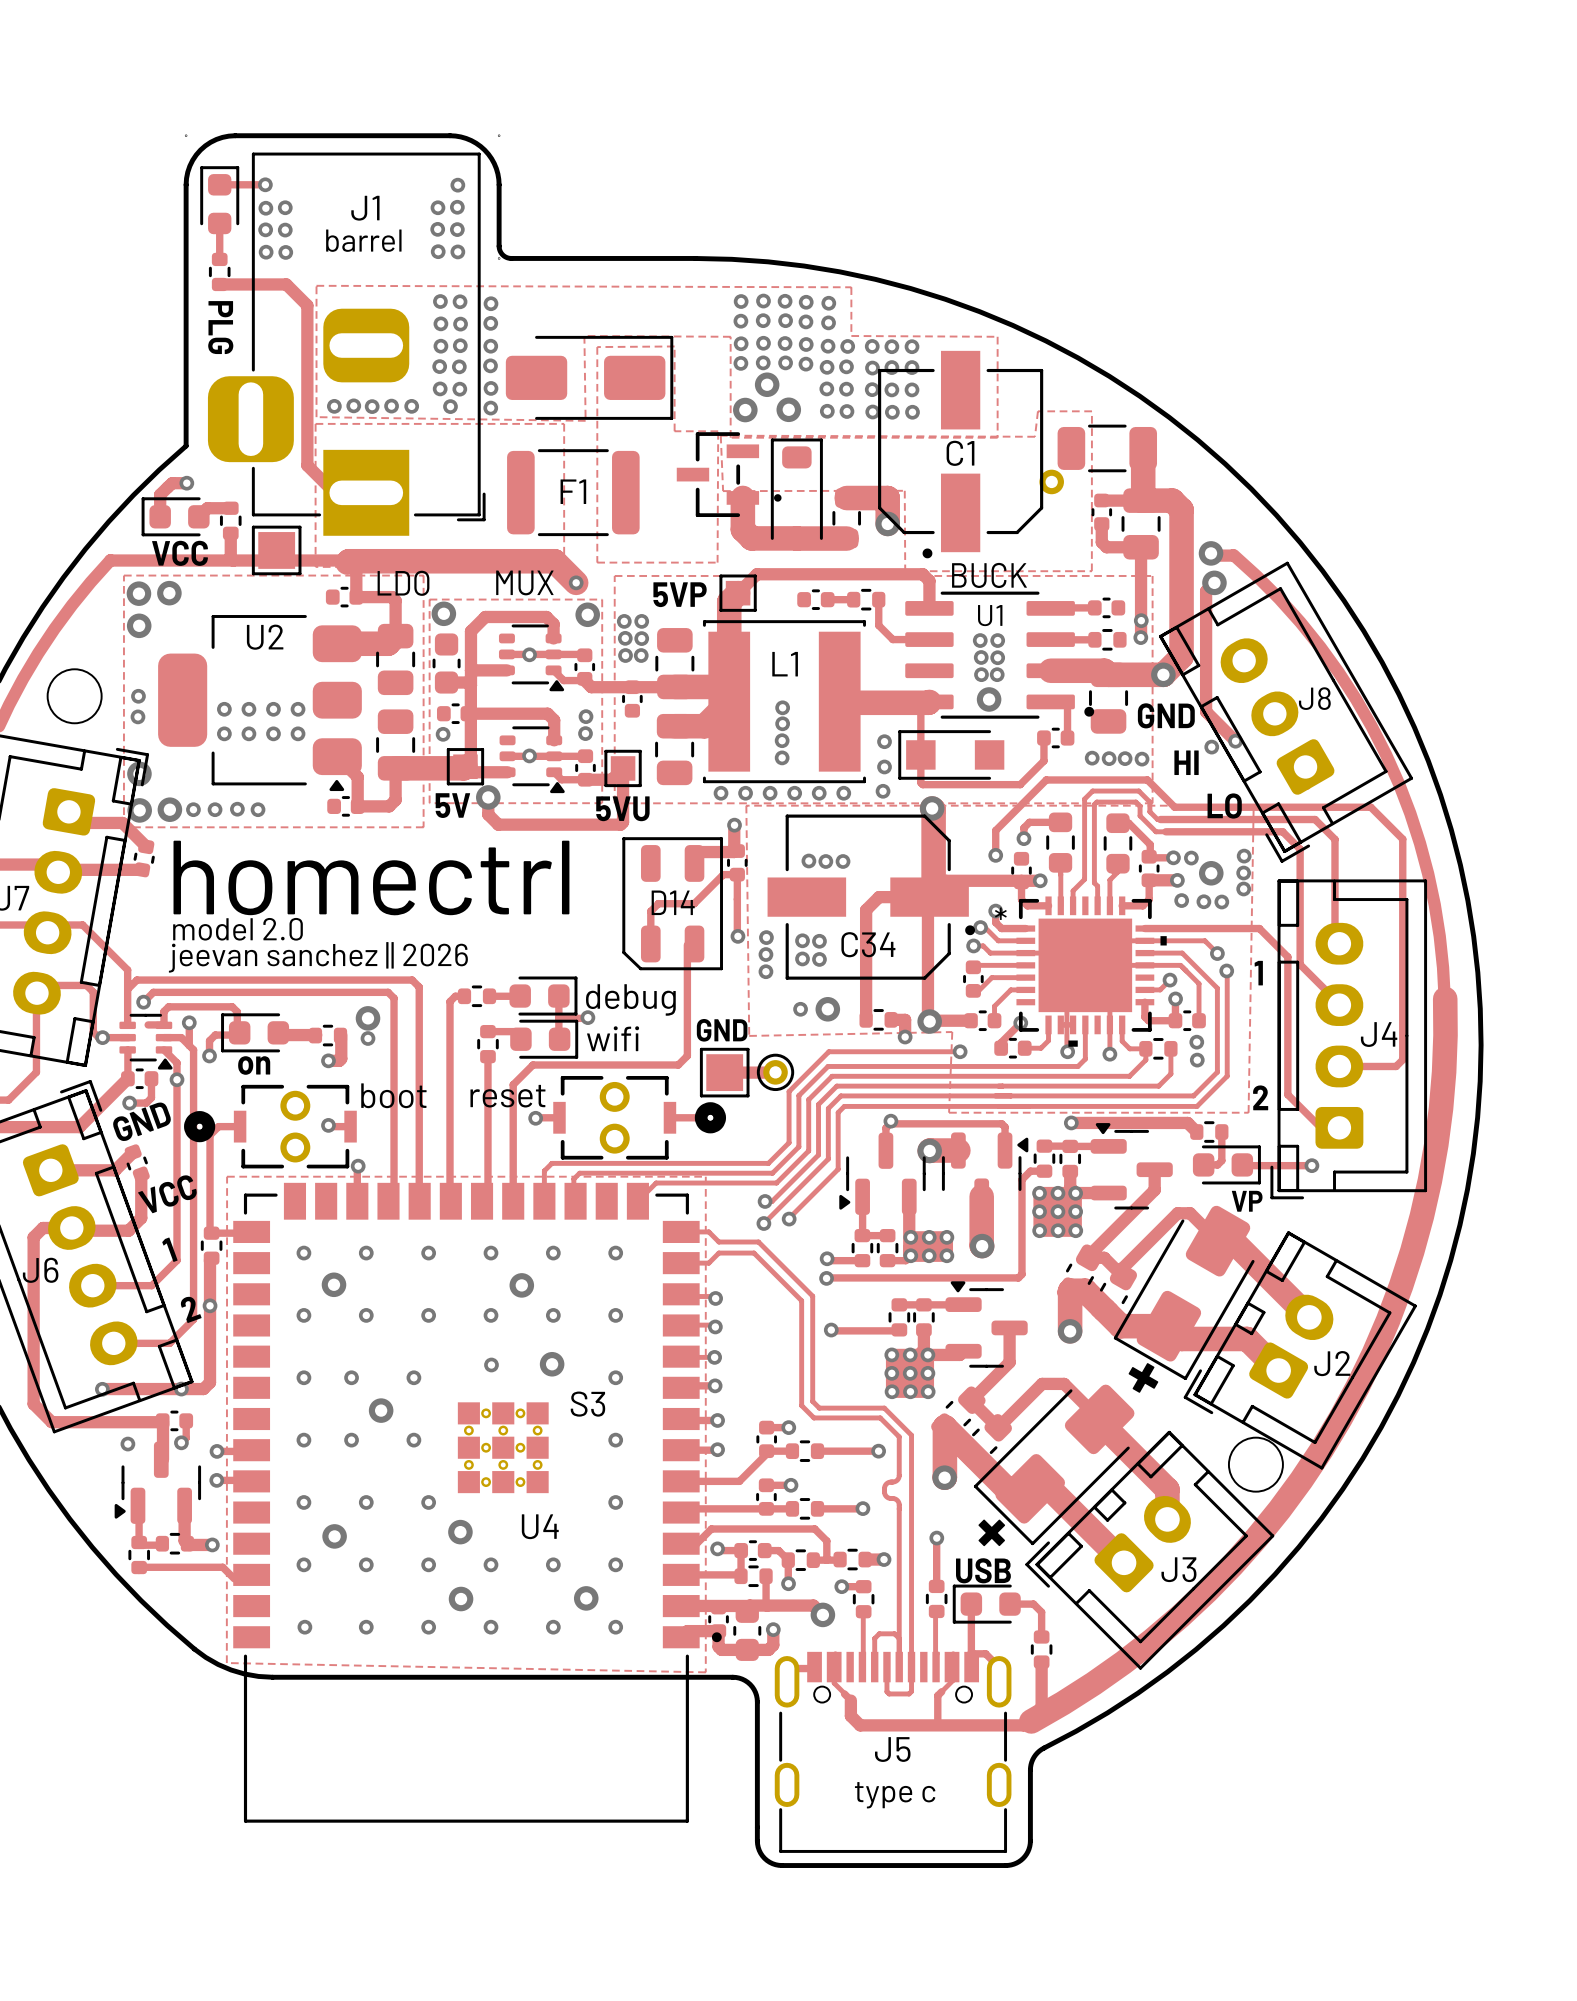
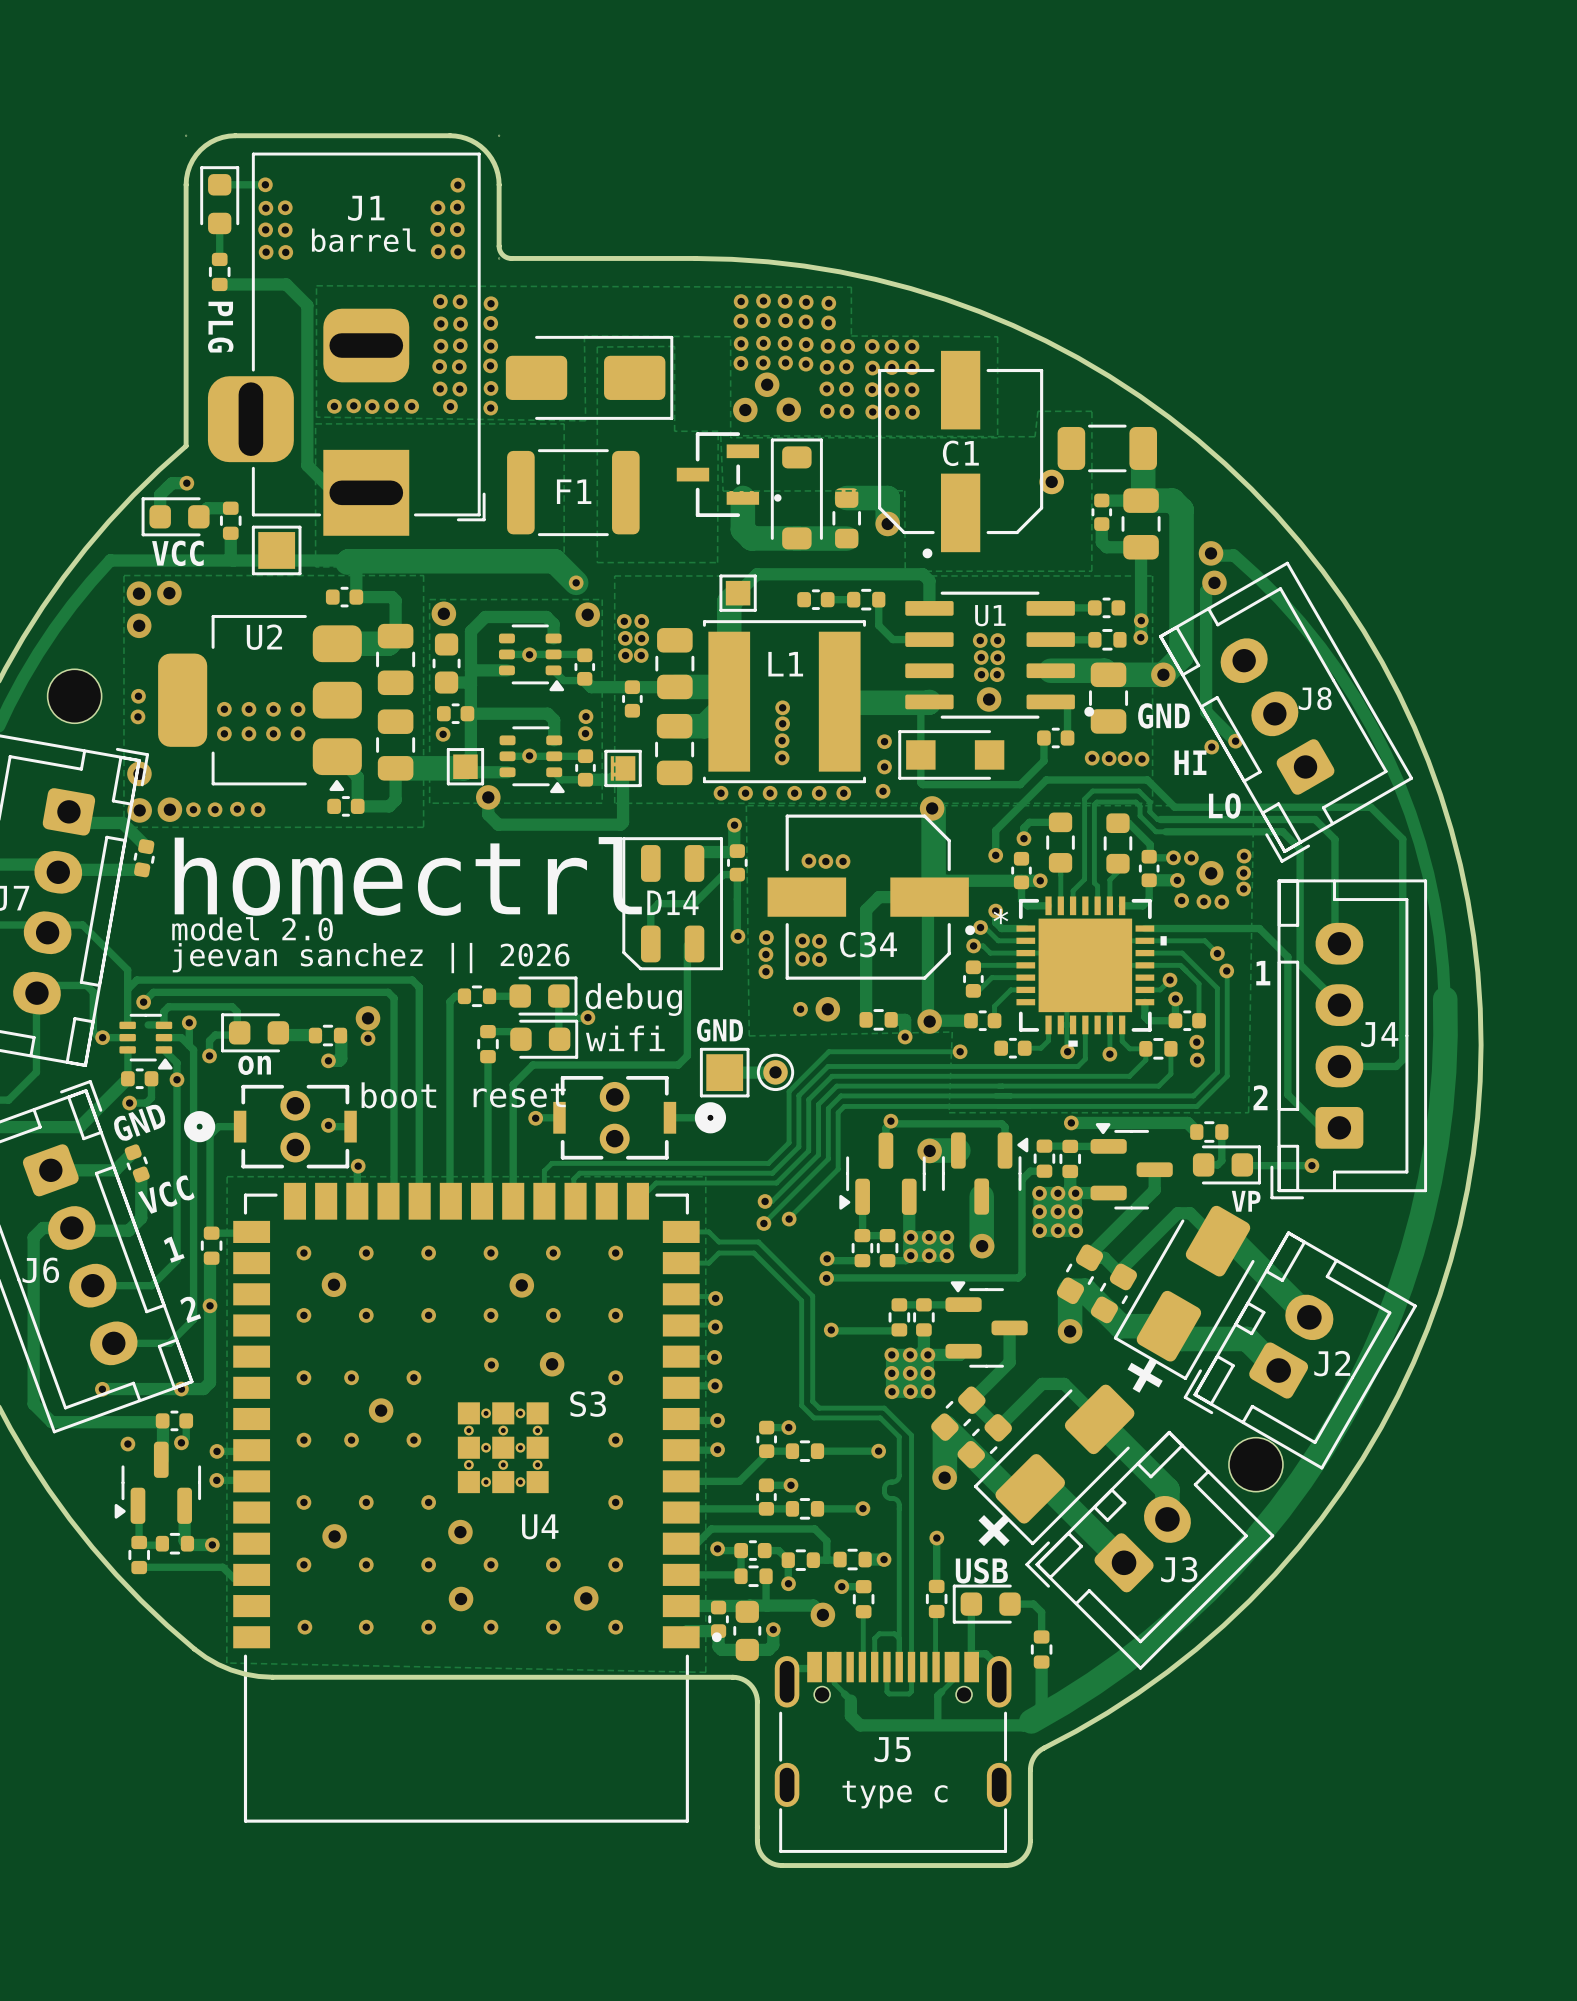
text: BUCK (989, 575) -> none
text: MUX (524, 582) -> none
text: LDO (403, 583) -> none
text: 5VP (680, 594) -> none
text: 5V (452, 805) -> none
text: 5VU (622, 808) -> none
track: (1020, 1023) (1001, 1042) (1001, 1048) -> none
via: (1020, 1023) -> none

